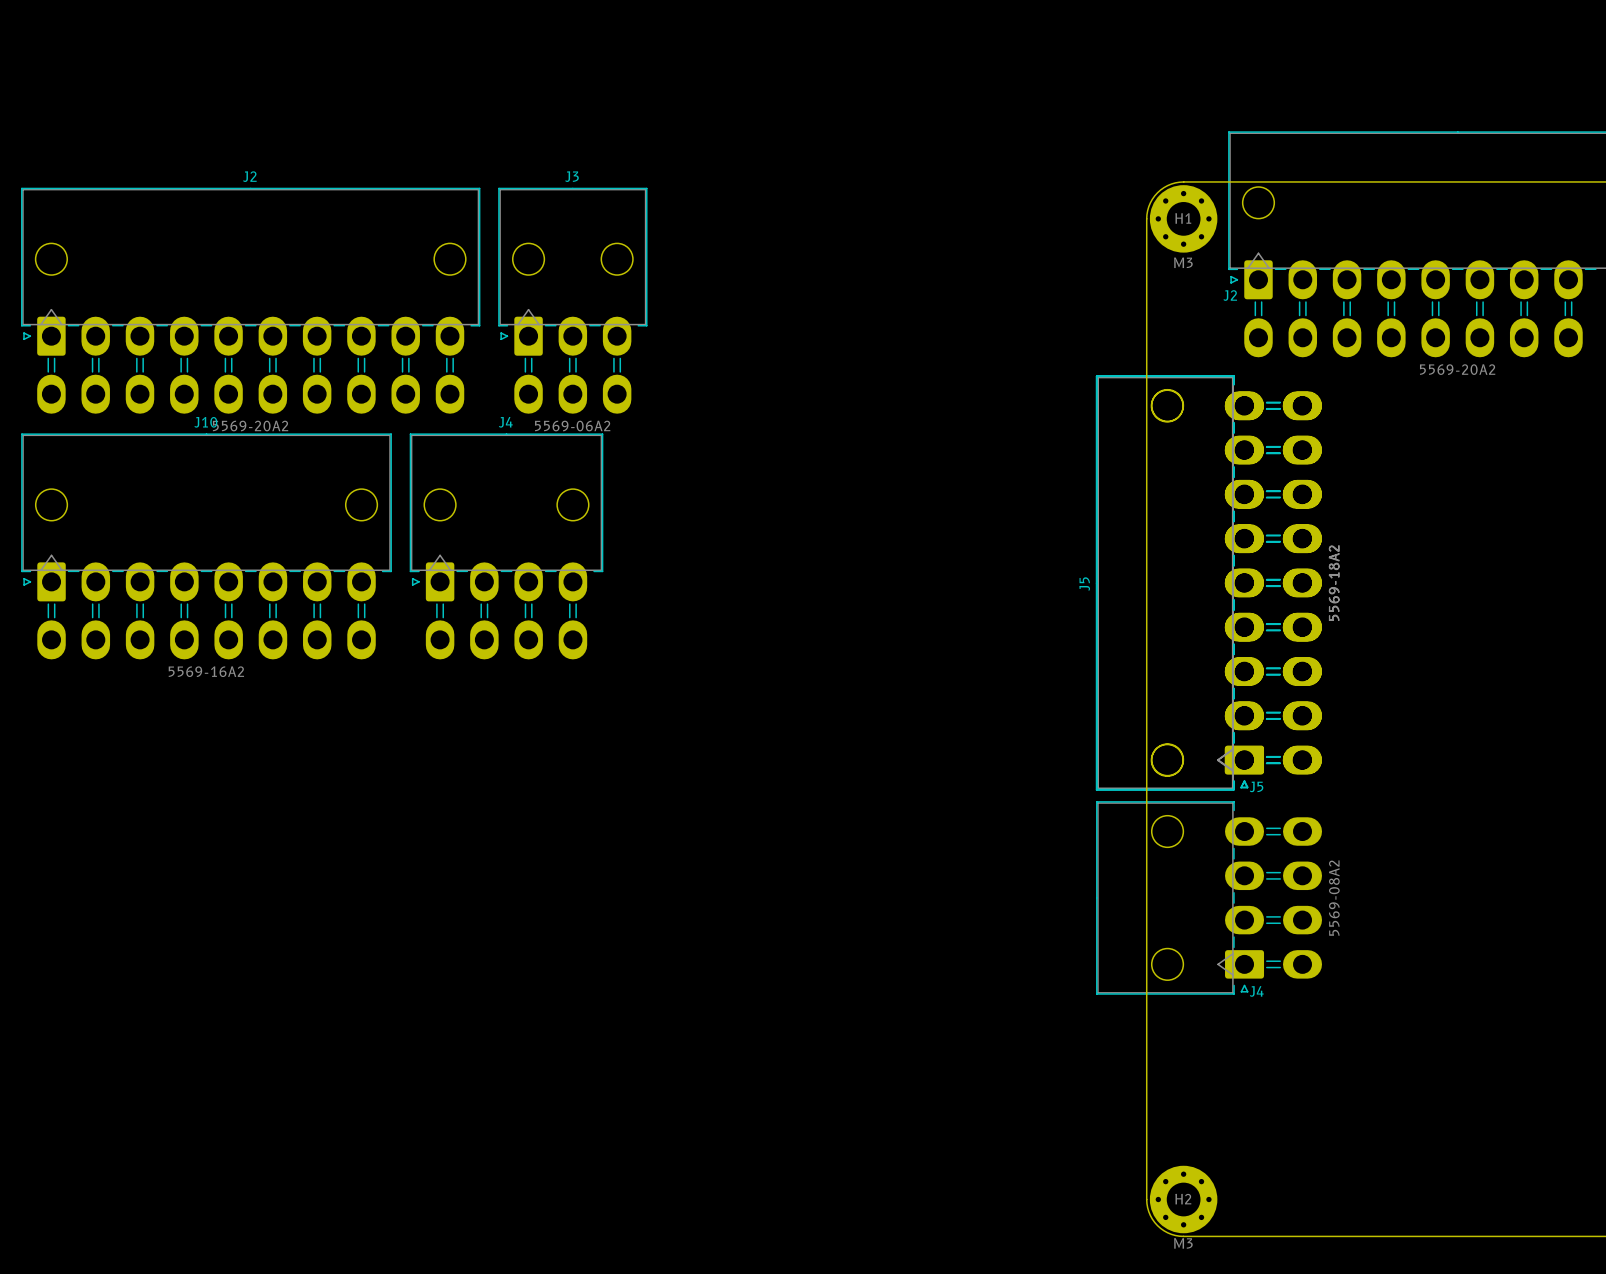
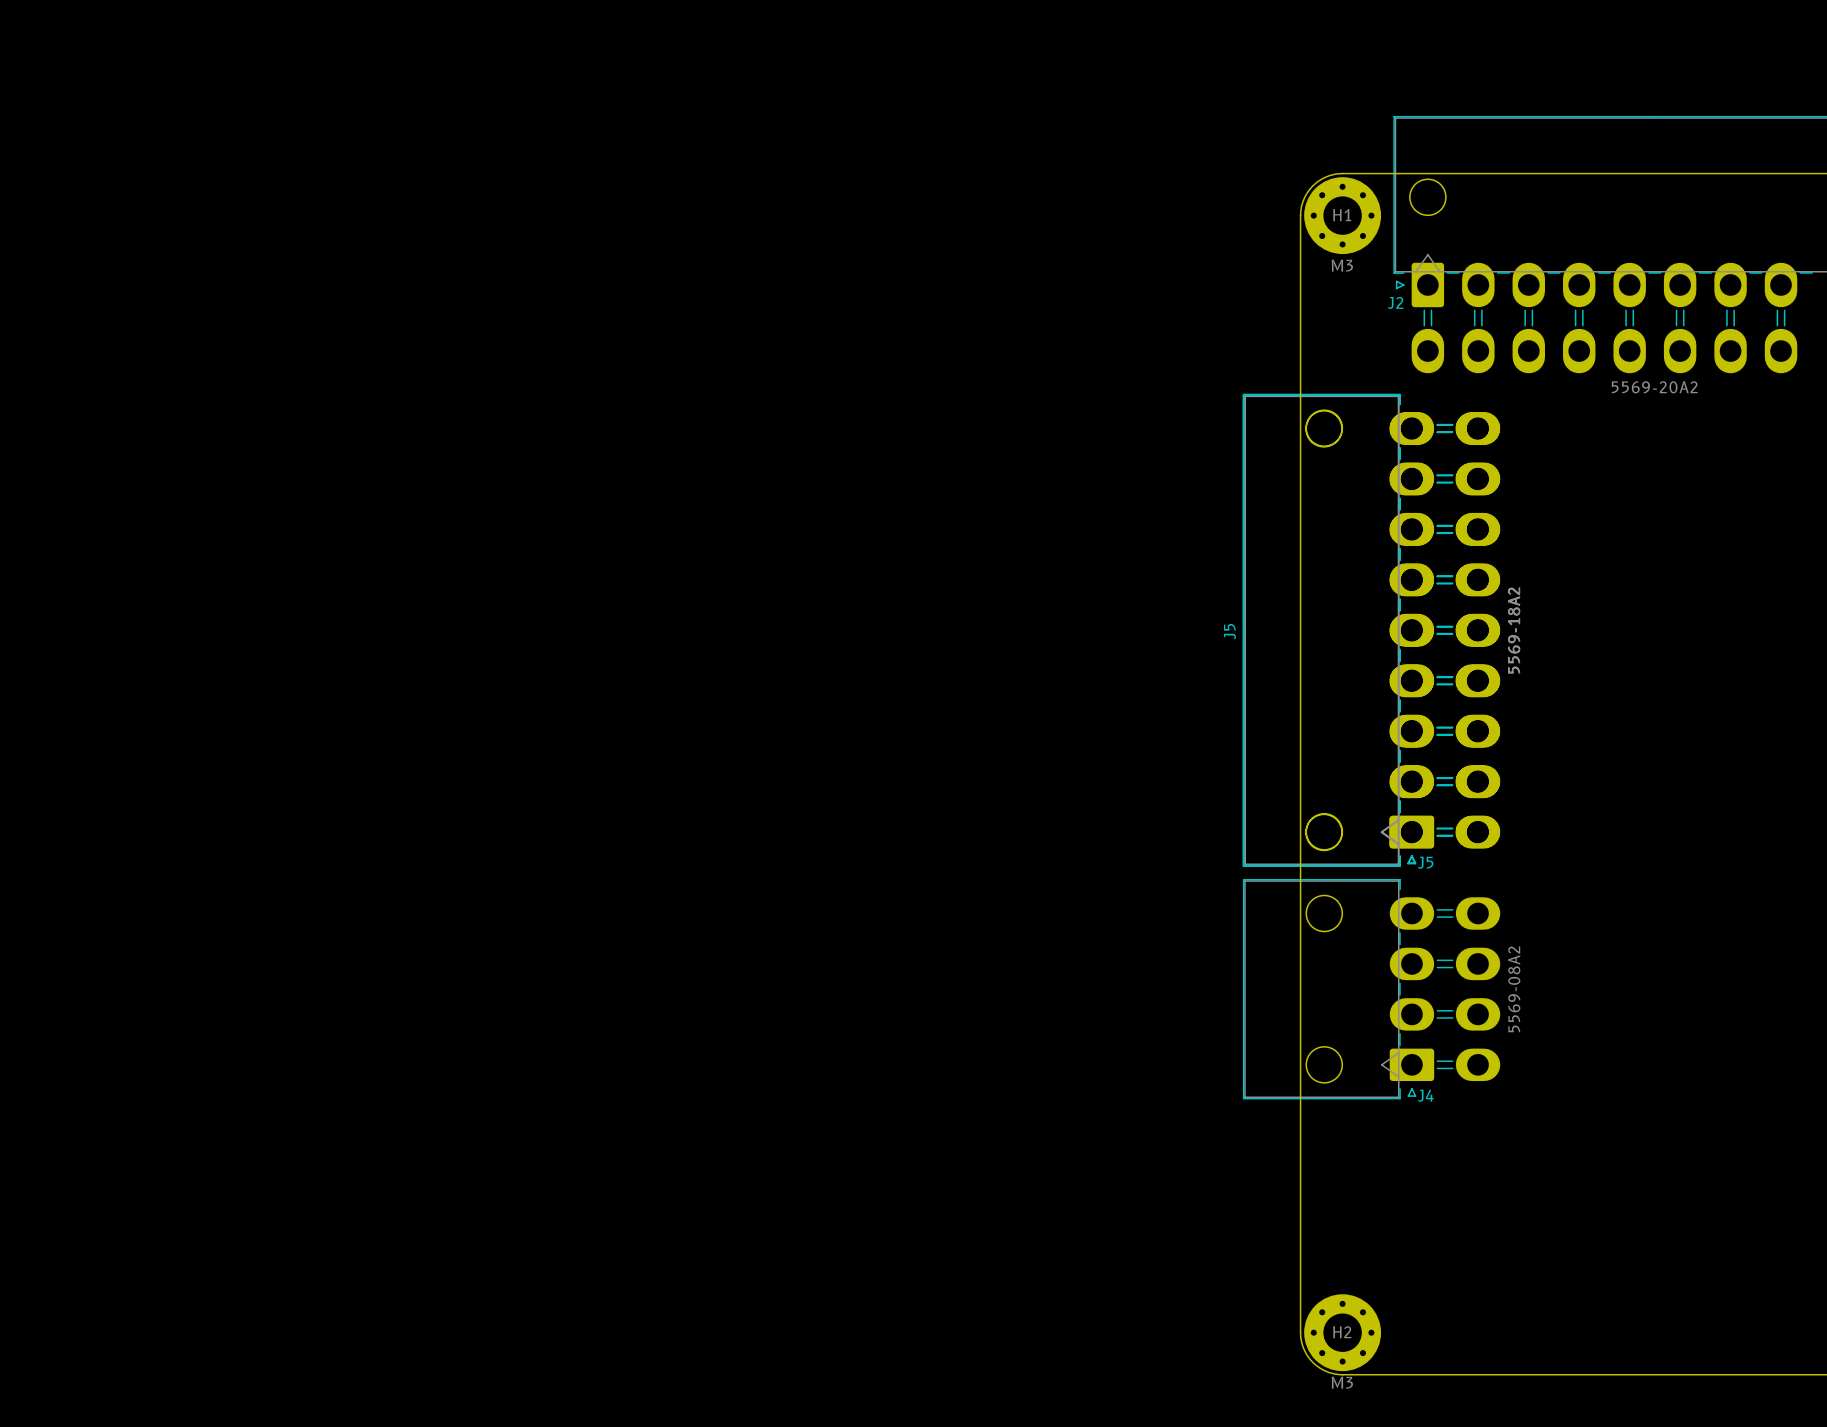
J2: 5569-20A2 (250, 300) -> none
J3: 5569-06A2 (572, 300) -> none
J10: 5569-16A2 (206, 546) -> none
J4: (506, 546) -> none

